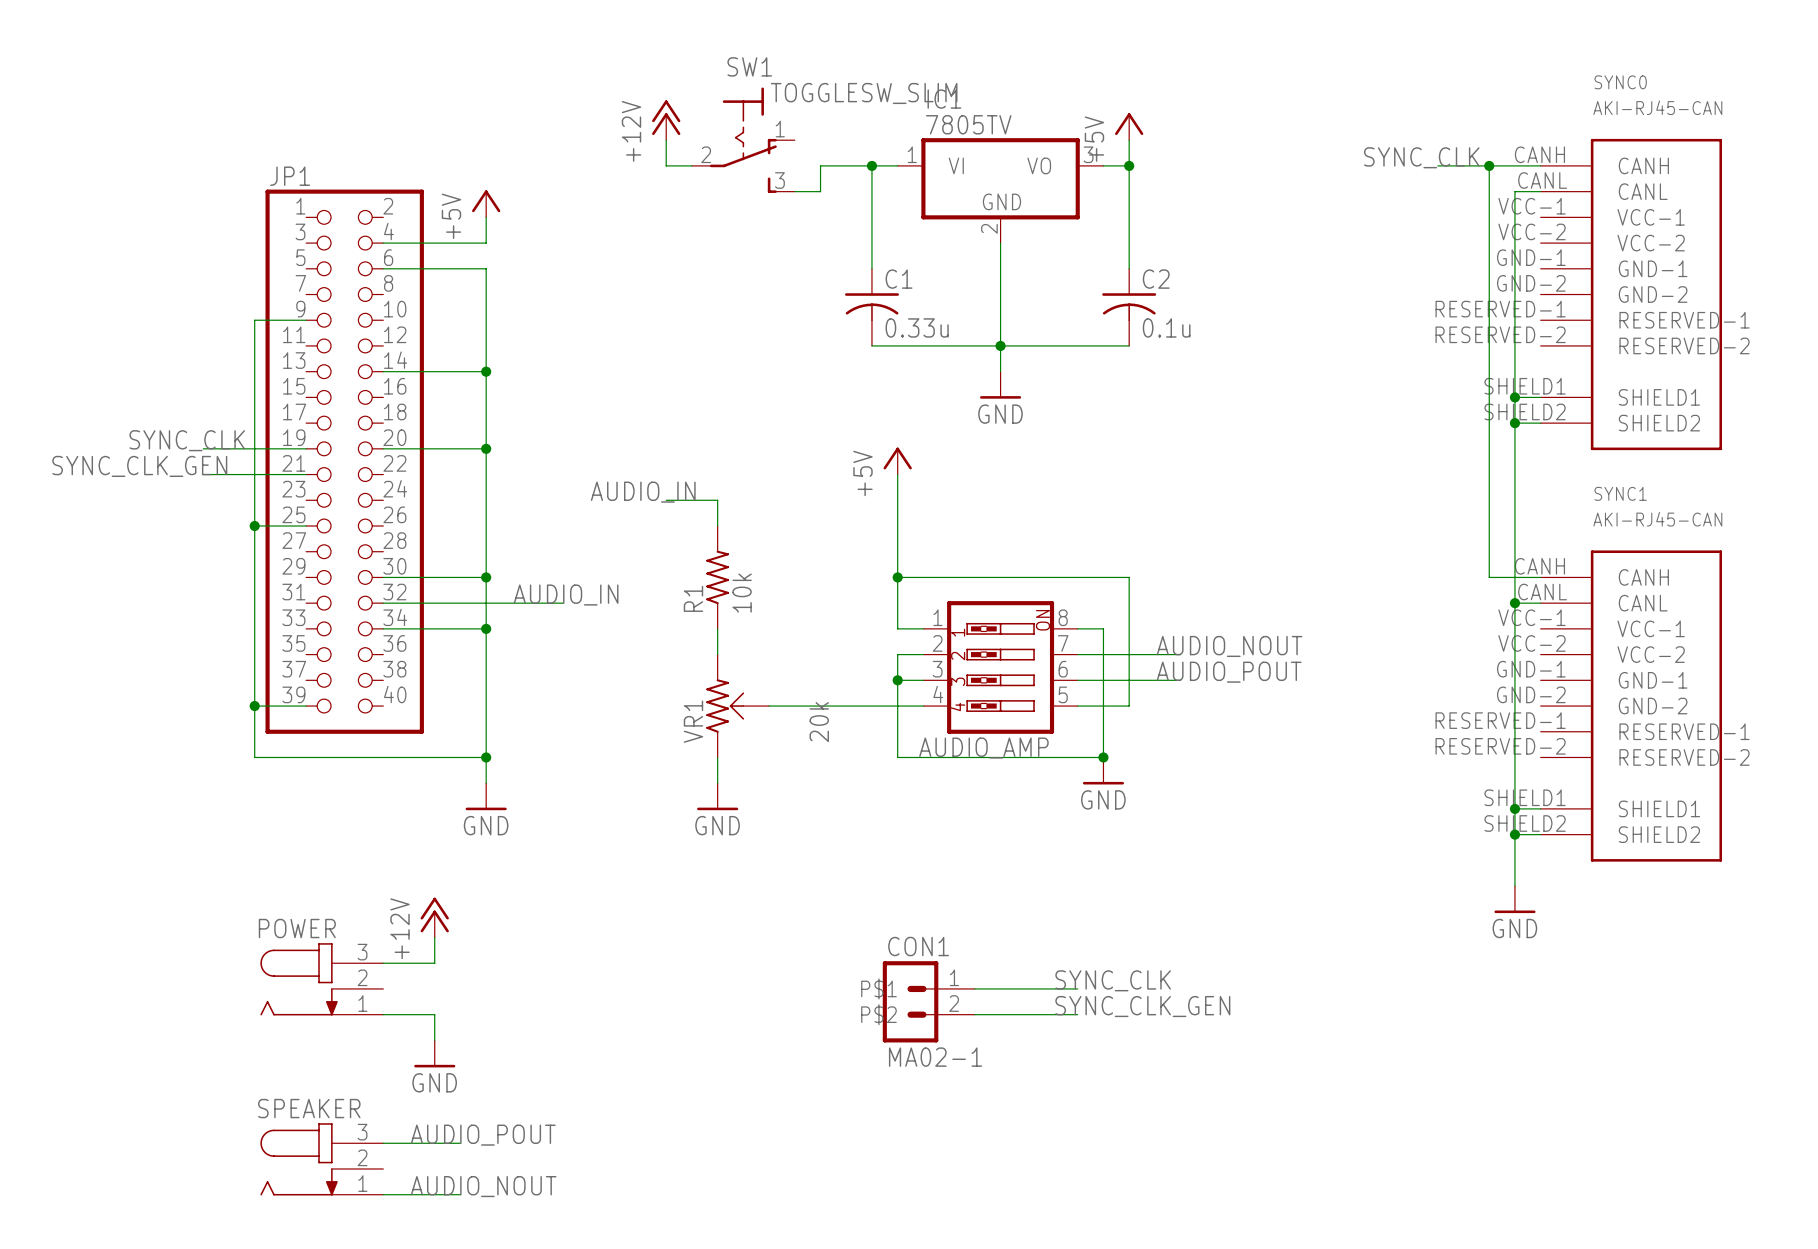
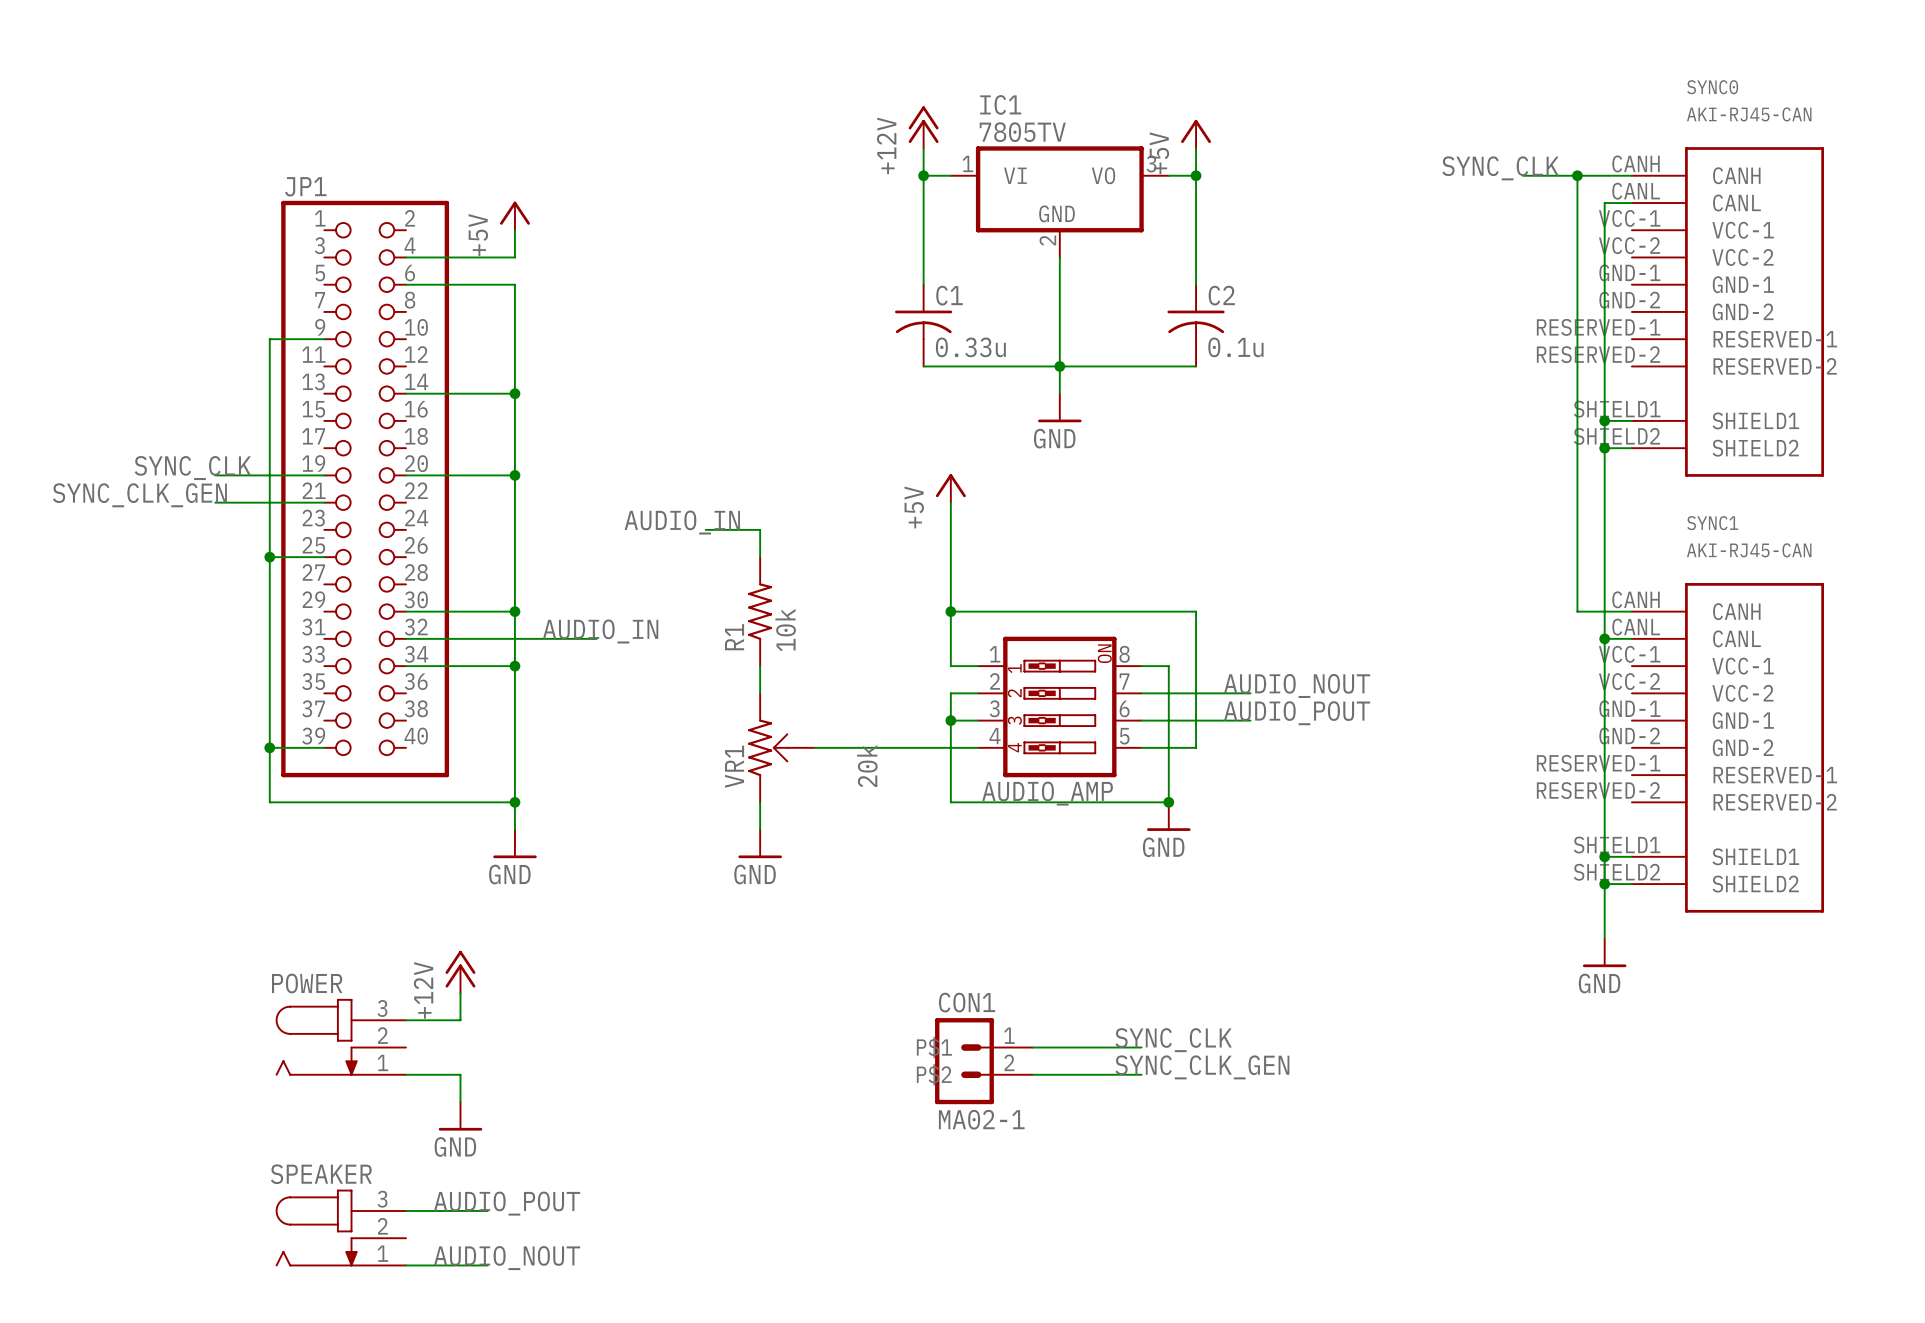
power symbol position: +12V (666, 120) -> +12V (923, 127)
wire: (666, 140) (666, 165) (691, 165) -> none
SW1: TOGGLESW_SLIM (743, 140) -> none
wire: (871, 165) (820, 165) (820, 191) (794, 191) -> (923, 175) (923, 148)

